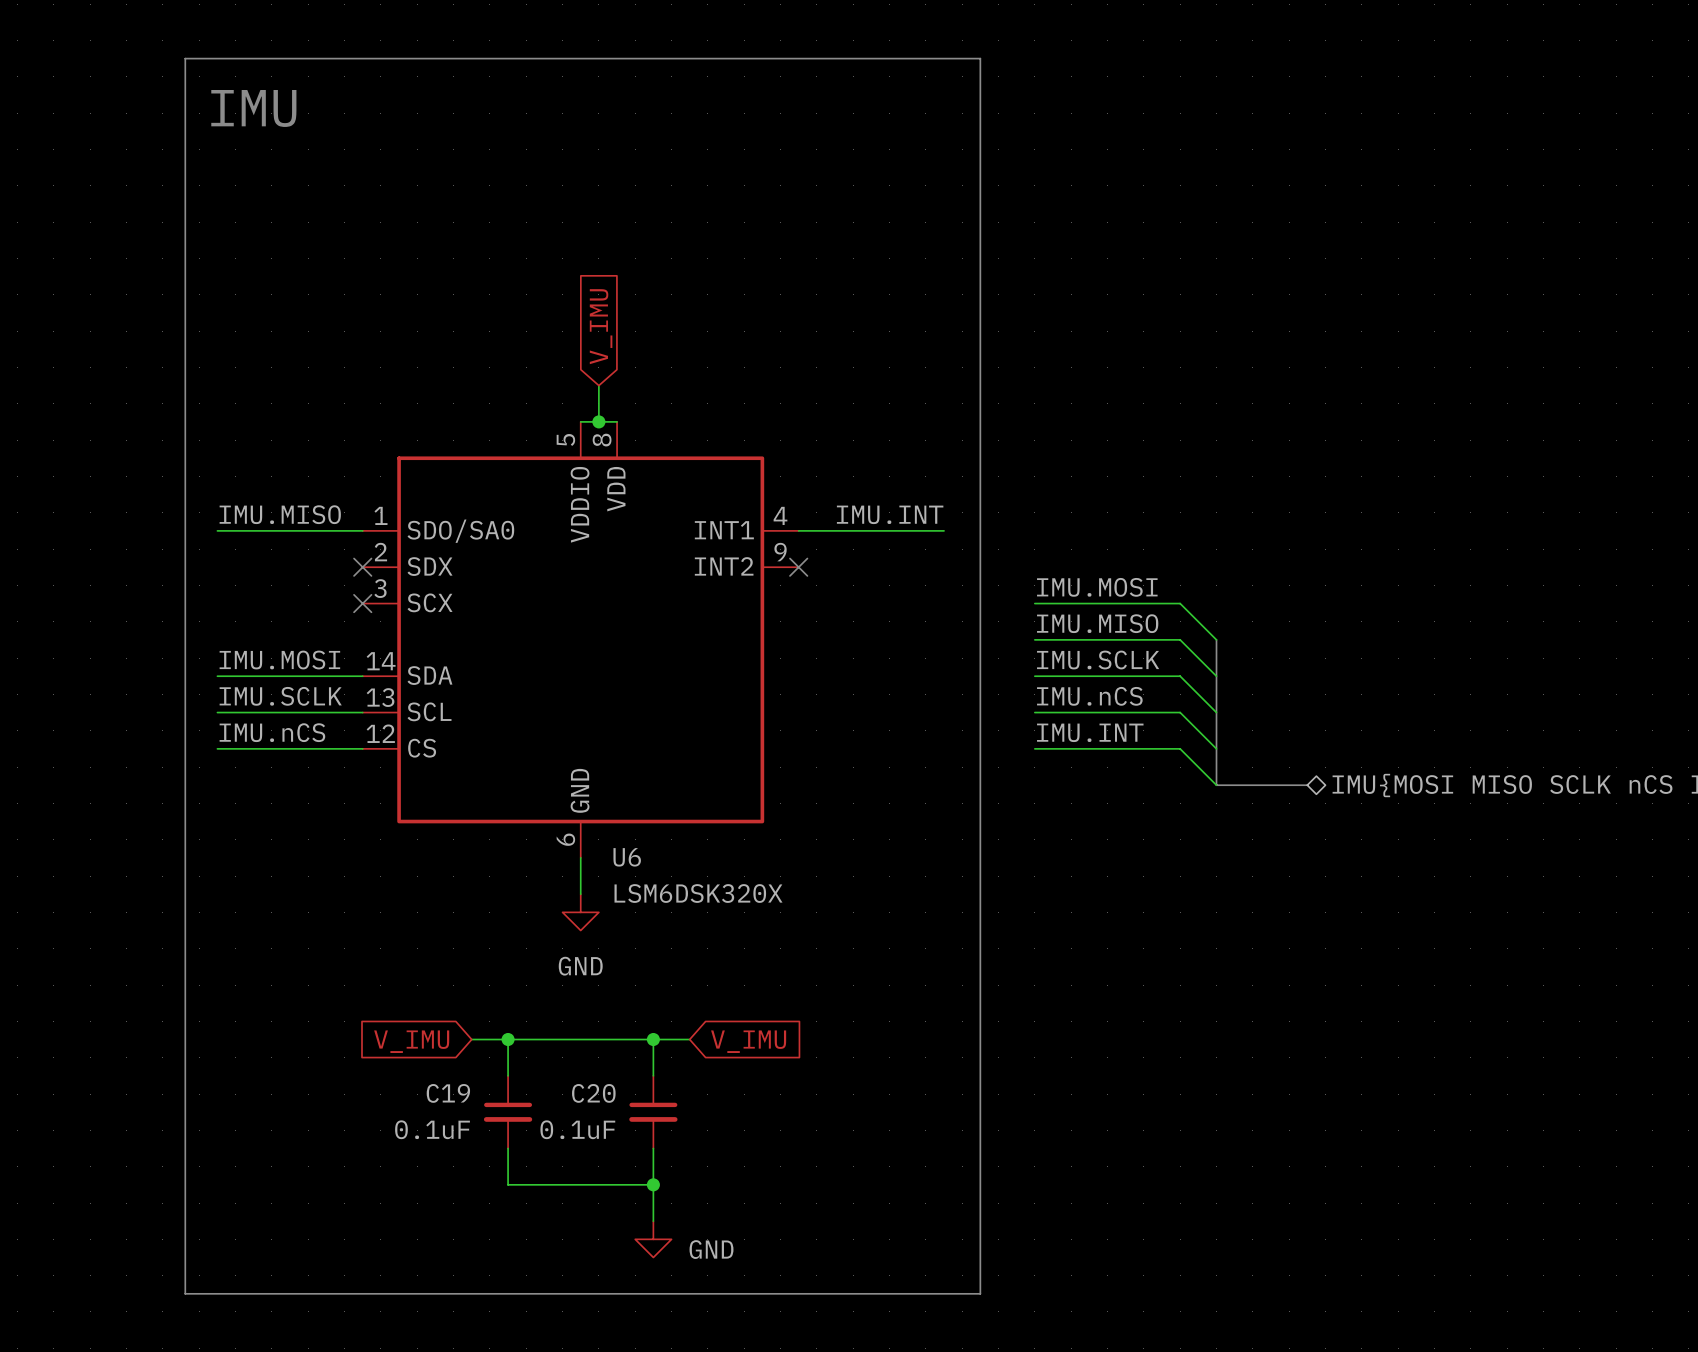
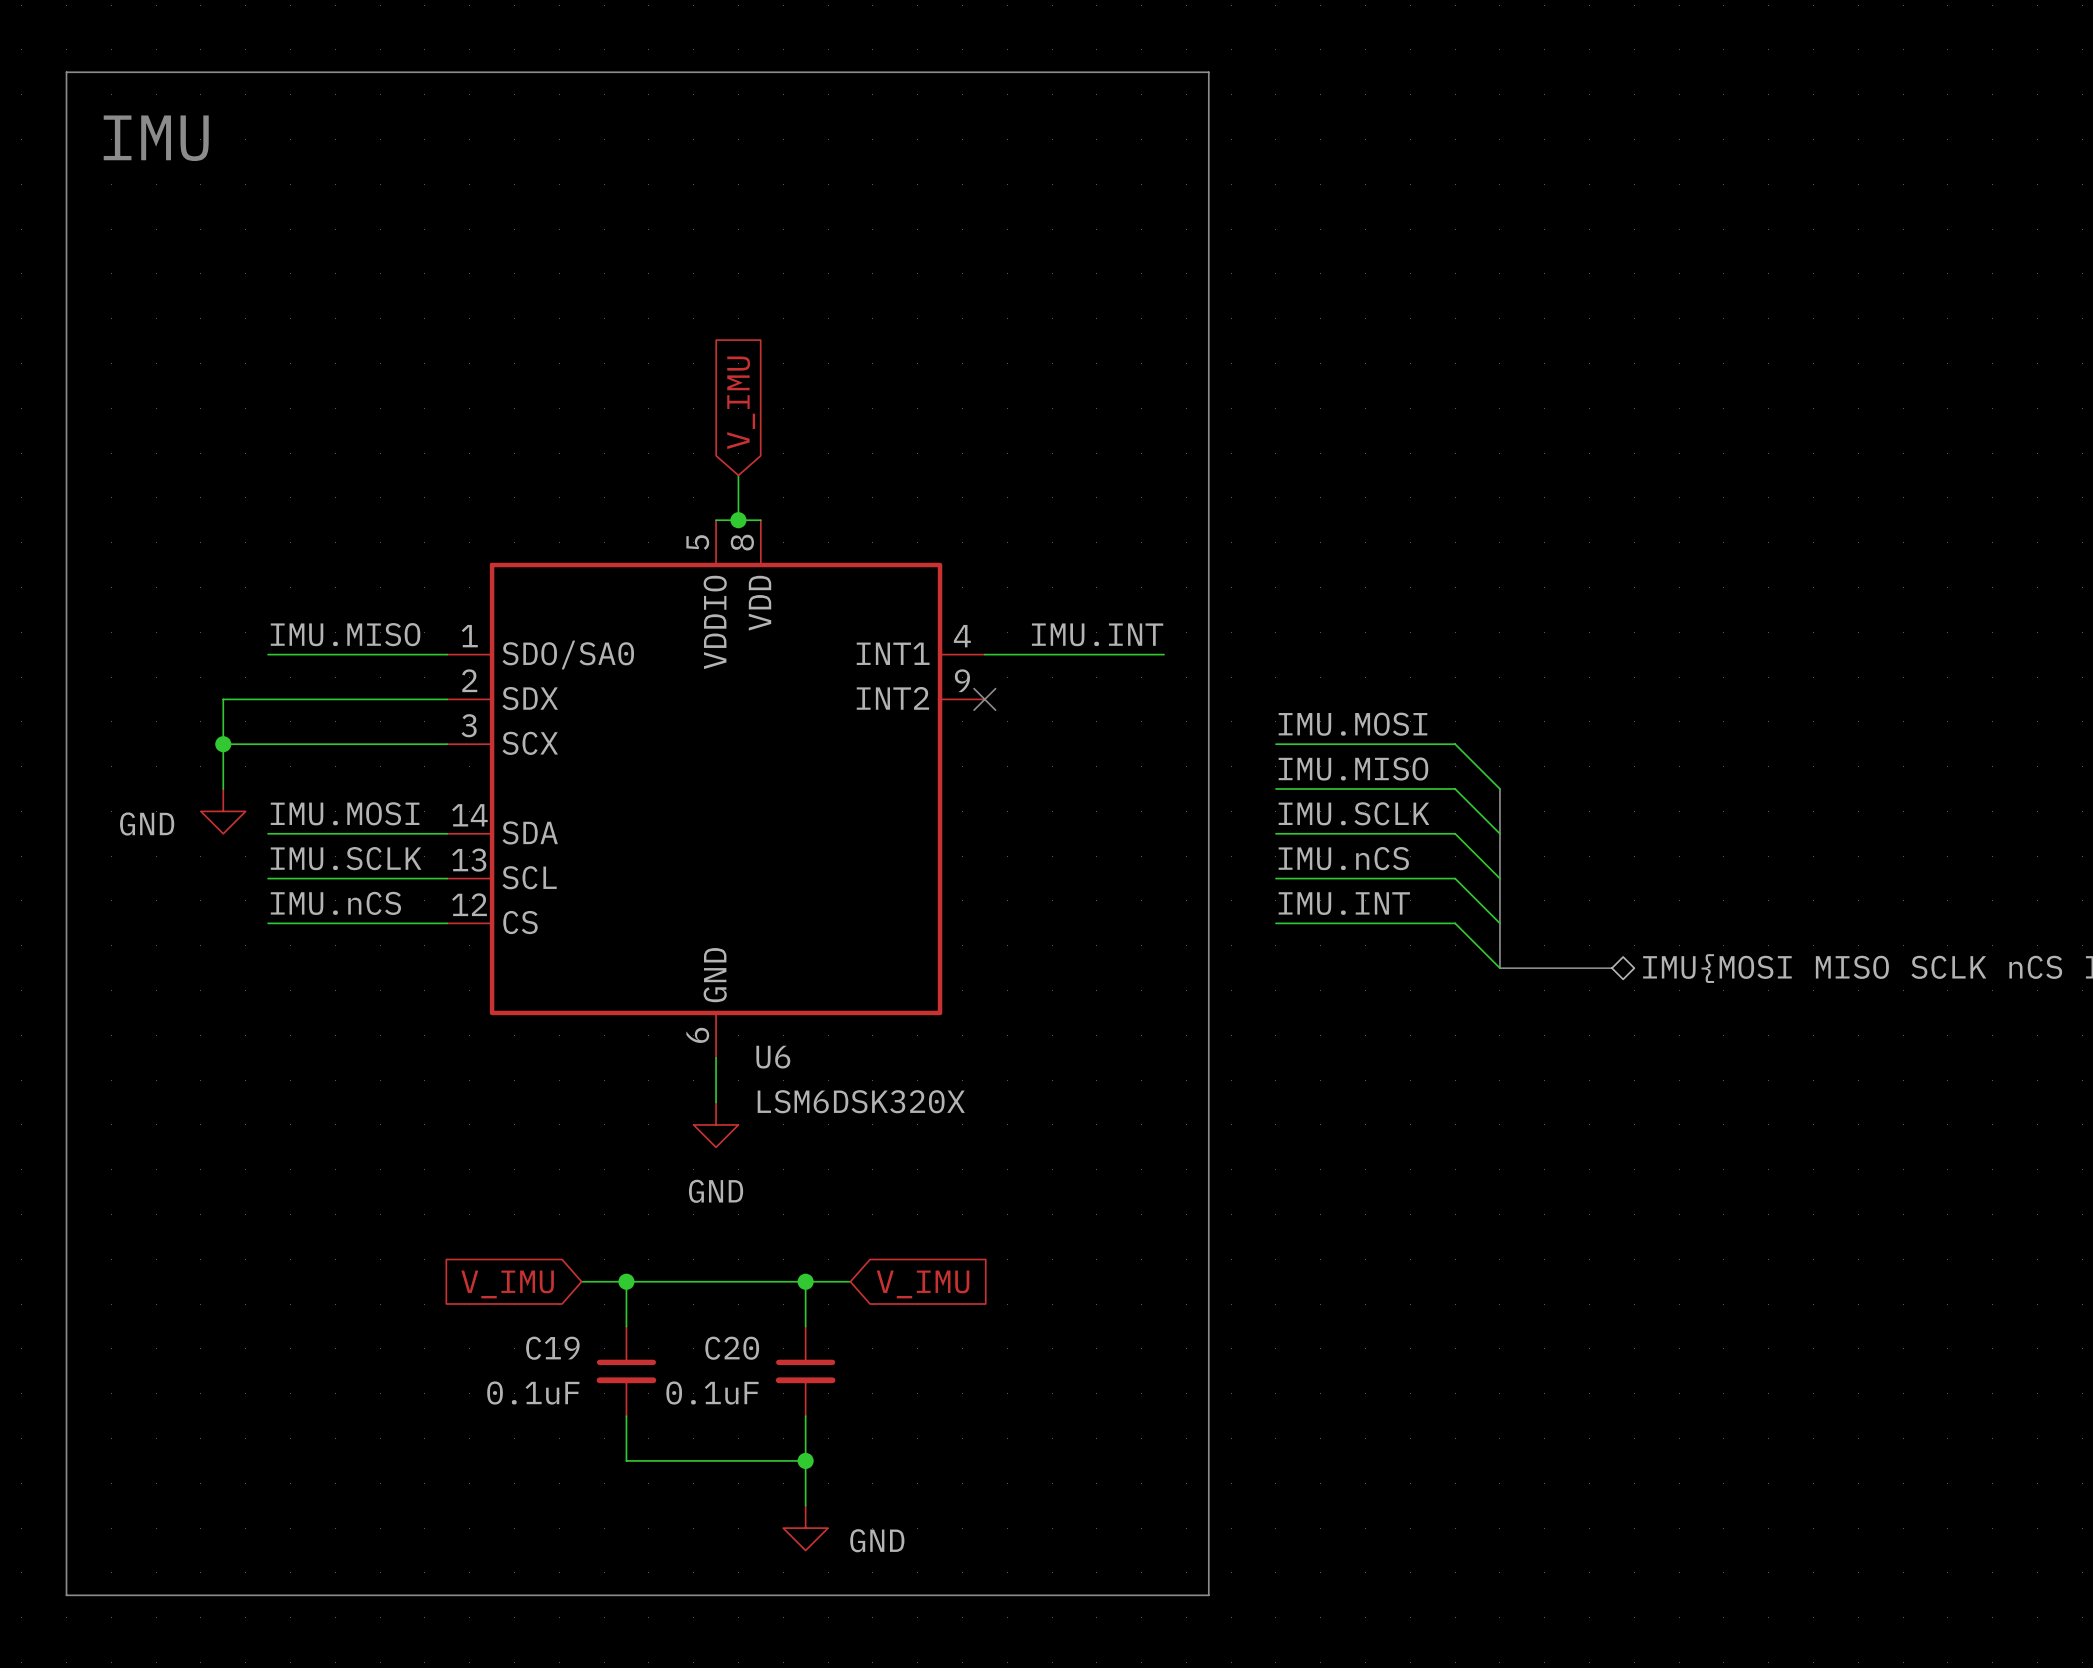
line: (185, 58) (185, 1293) -> (228, 72) (66, 72) (66, 1595) (228, 1595)
text position: IMU (253, 108) -> IMU (156, 138)
wire: none -> (447, 699) (223, 699) (223, 788)
no-connect mark: (362, 567) -> none
wire: none -> (223, 744) (447, 744)
junction: none -> (223, 744)
no-connect mark: (362, 603) -> none
power symbol: none -> GND (223, 811)

